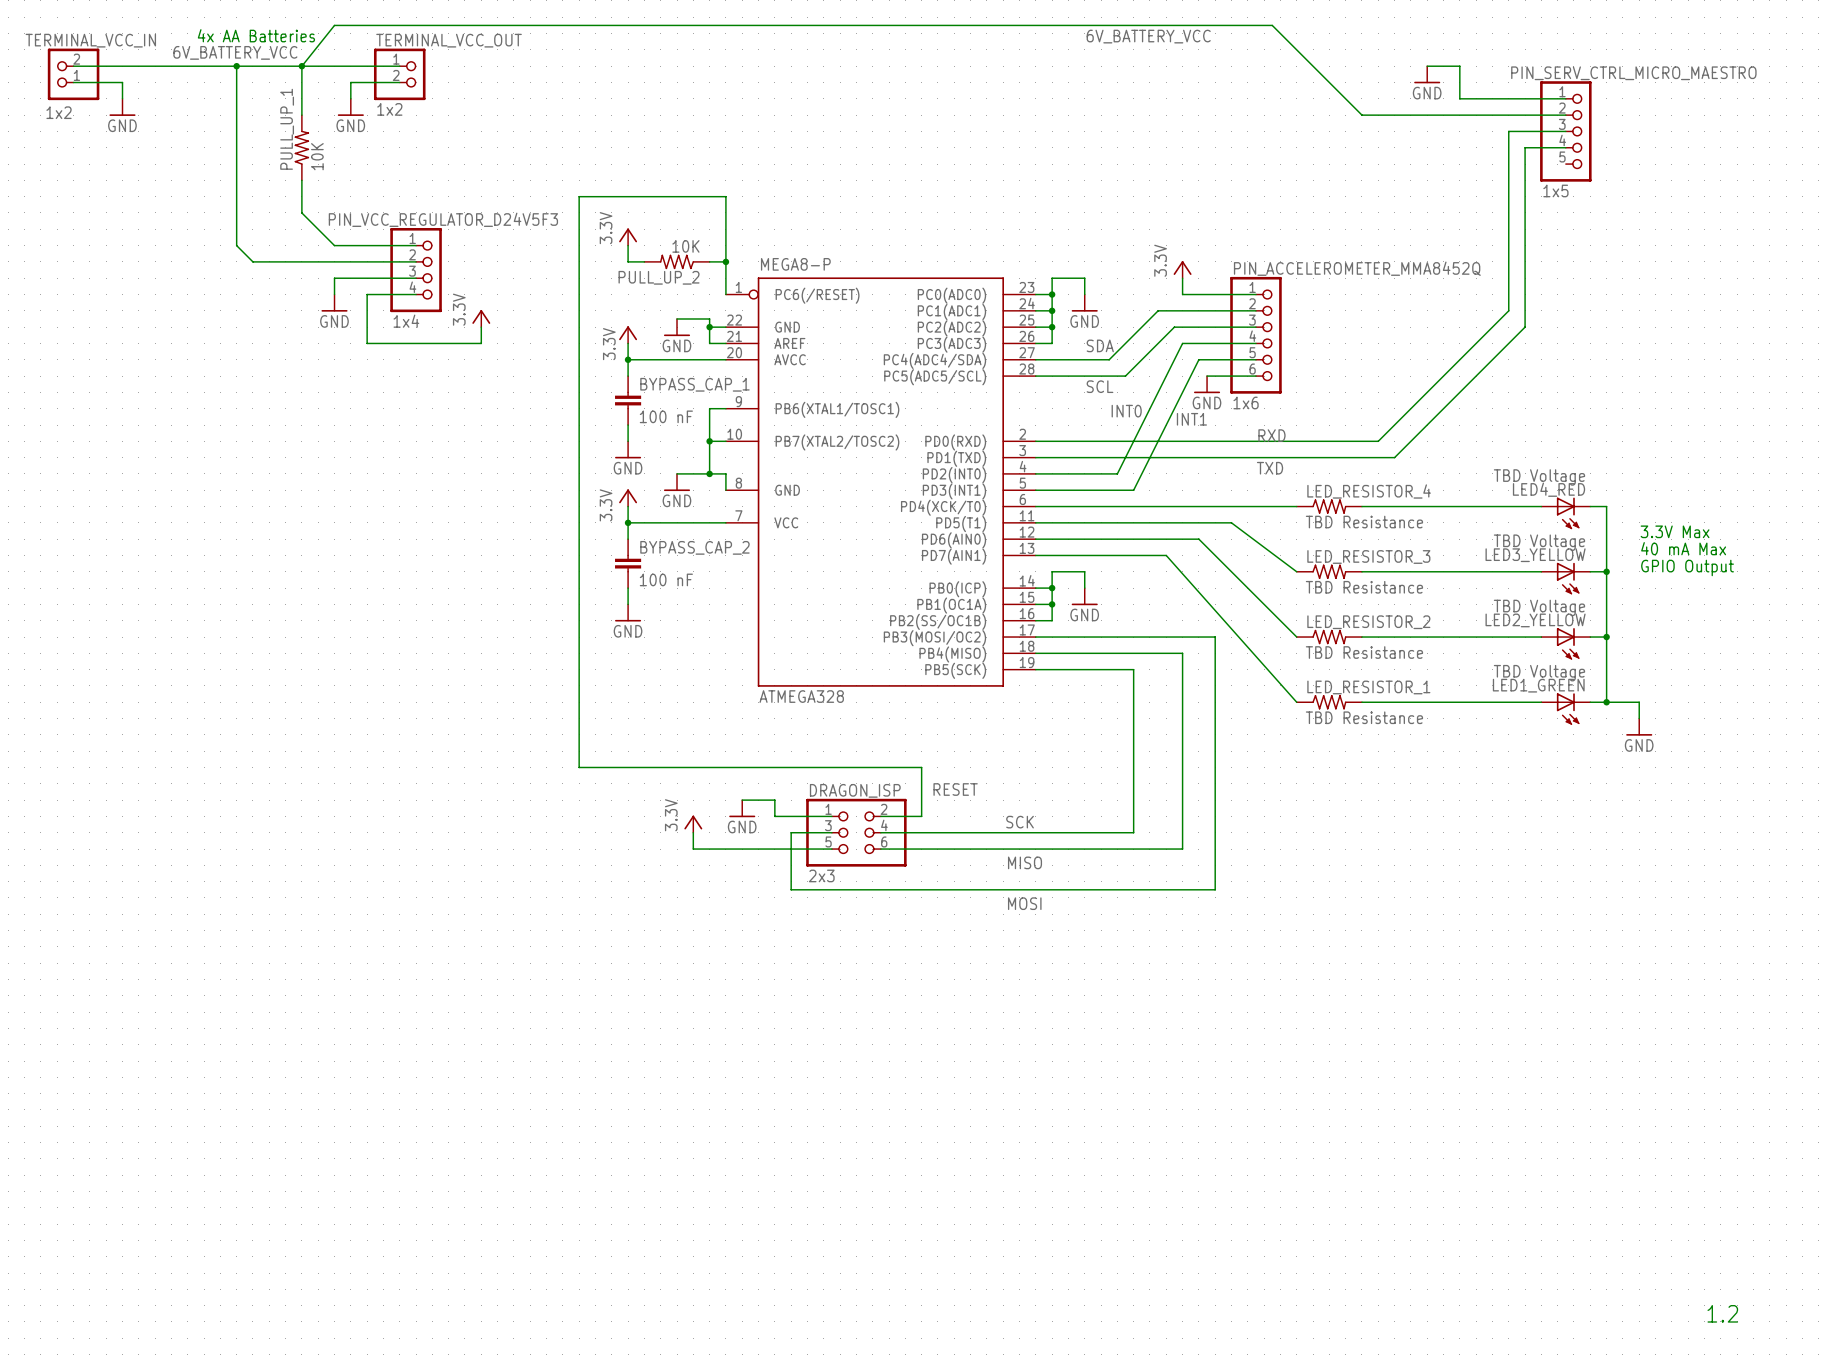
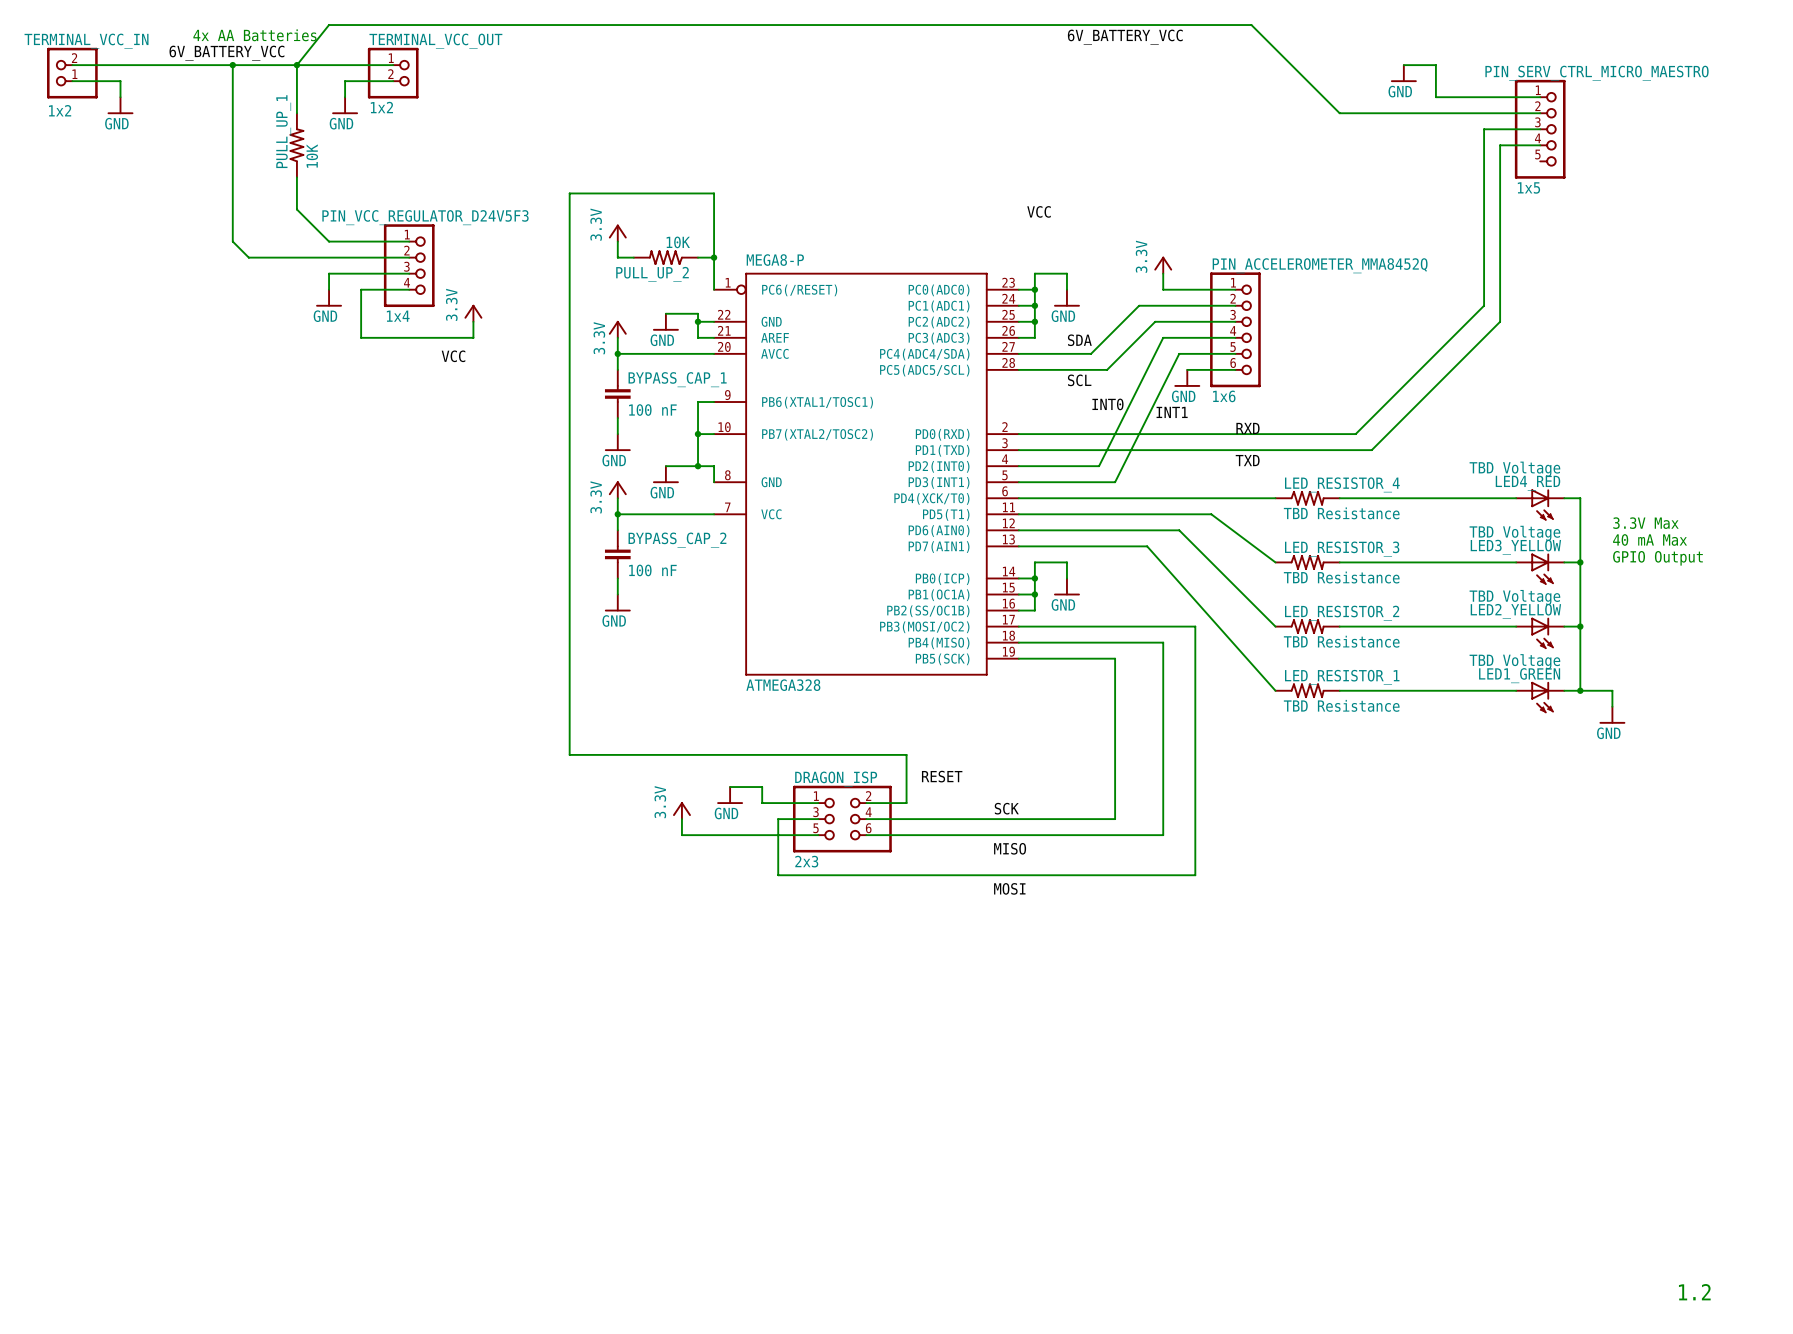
label: none -> VCC (1039, 211)
label: none -> VCC (453, 356)

